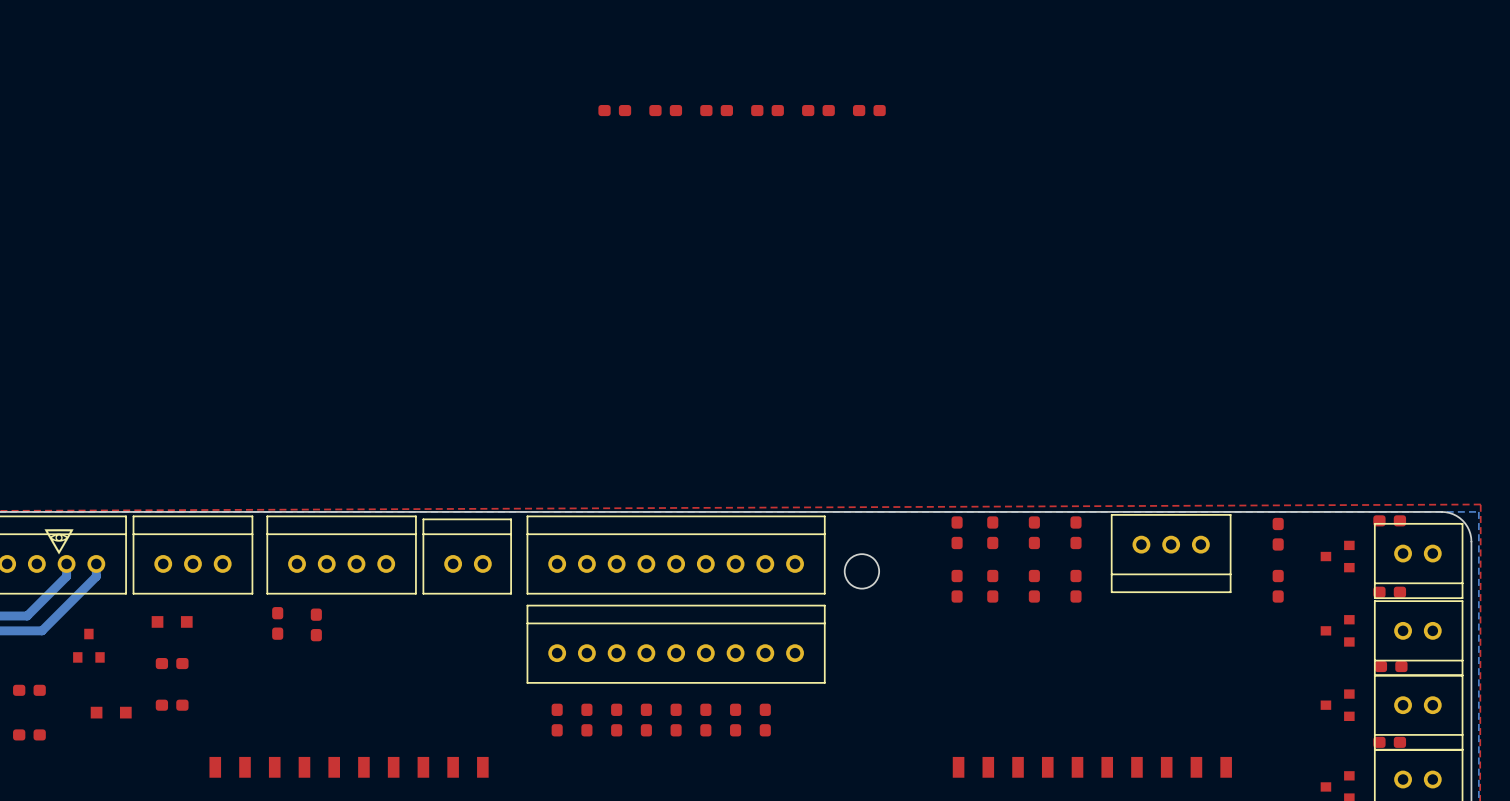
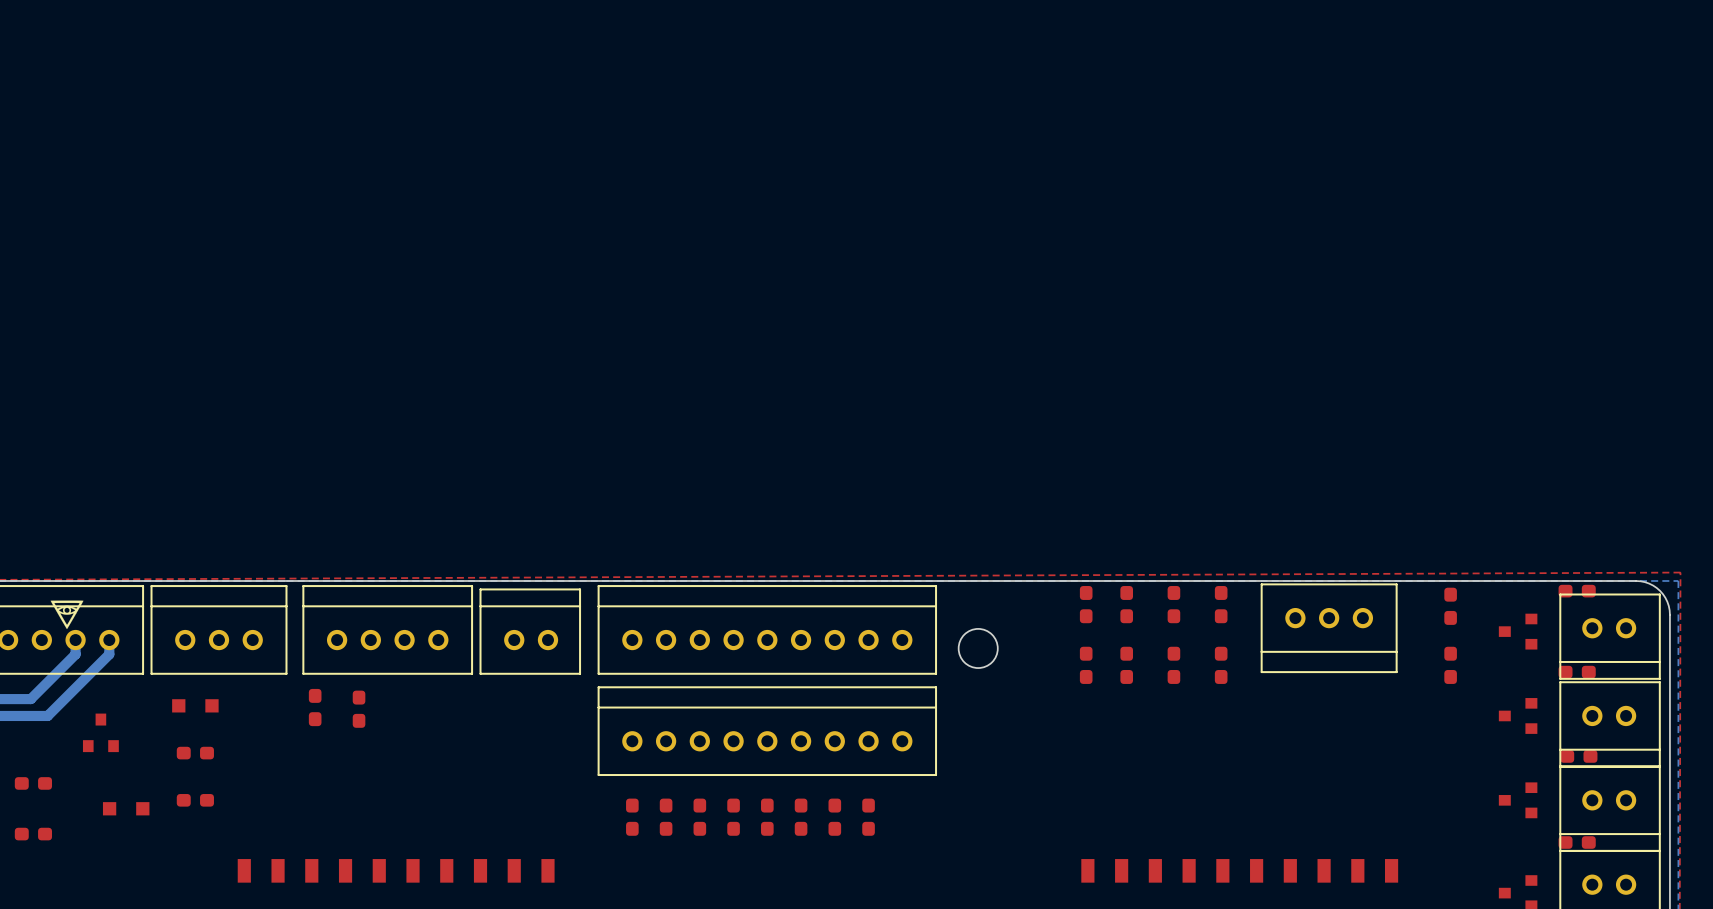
part: (614, 110) -> none
part: (665, 110) -> none
part: (716, 110) -> none
part: (767, 110) -> none
part: (818, 110) -> none
part: (869, 110) -> none

